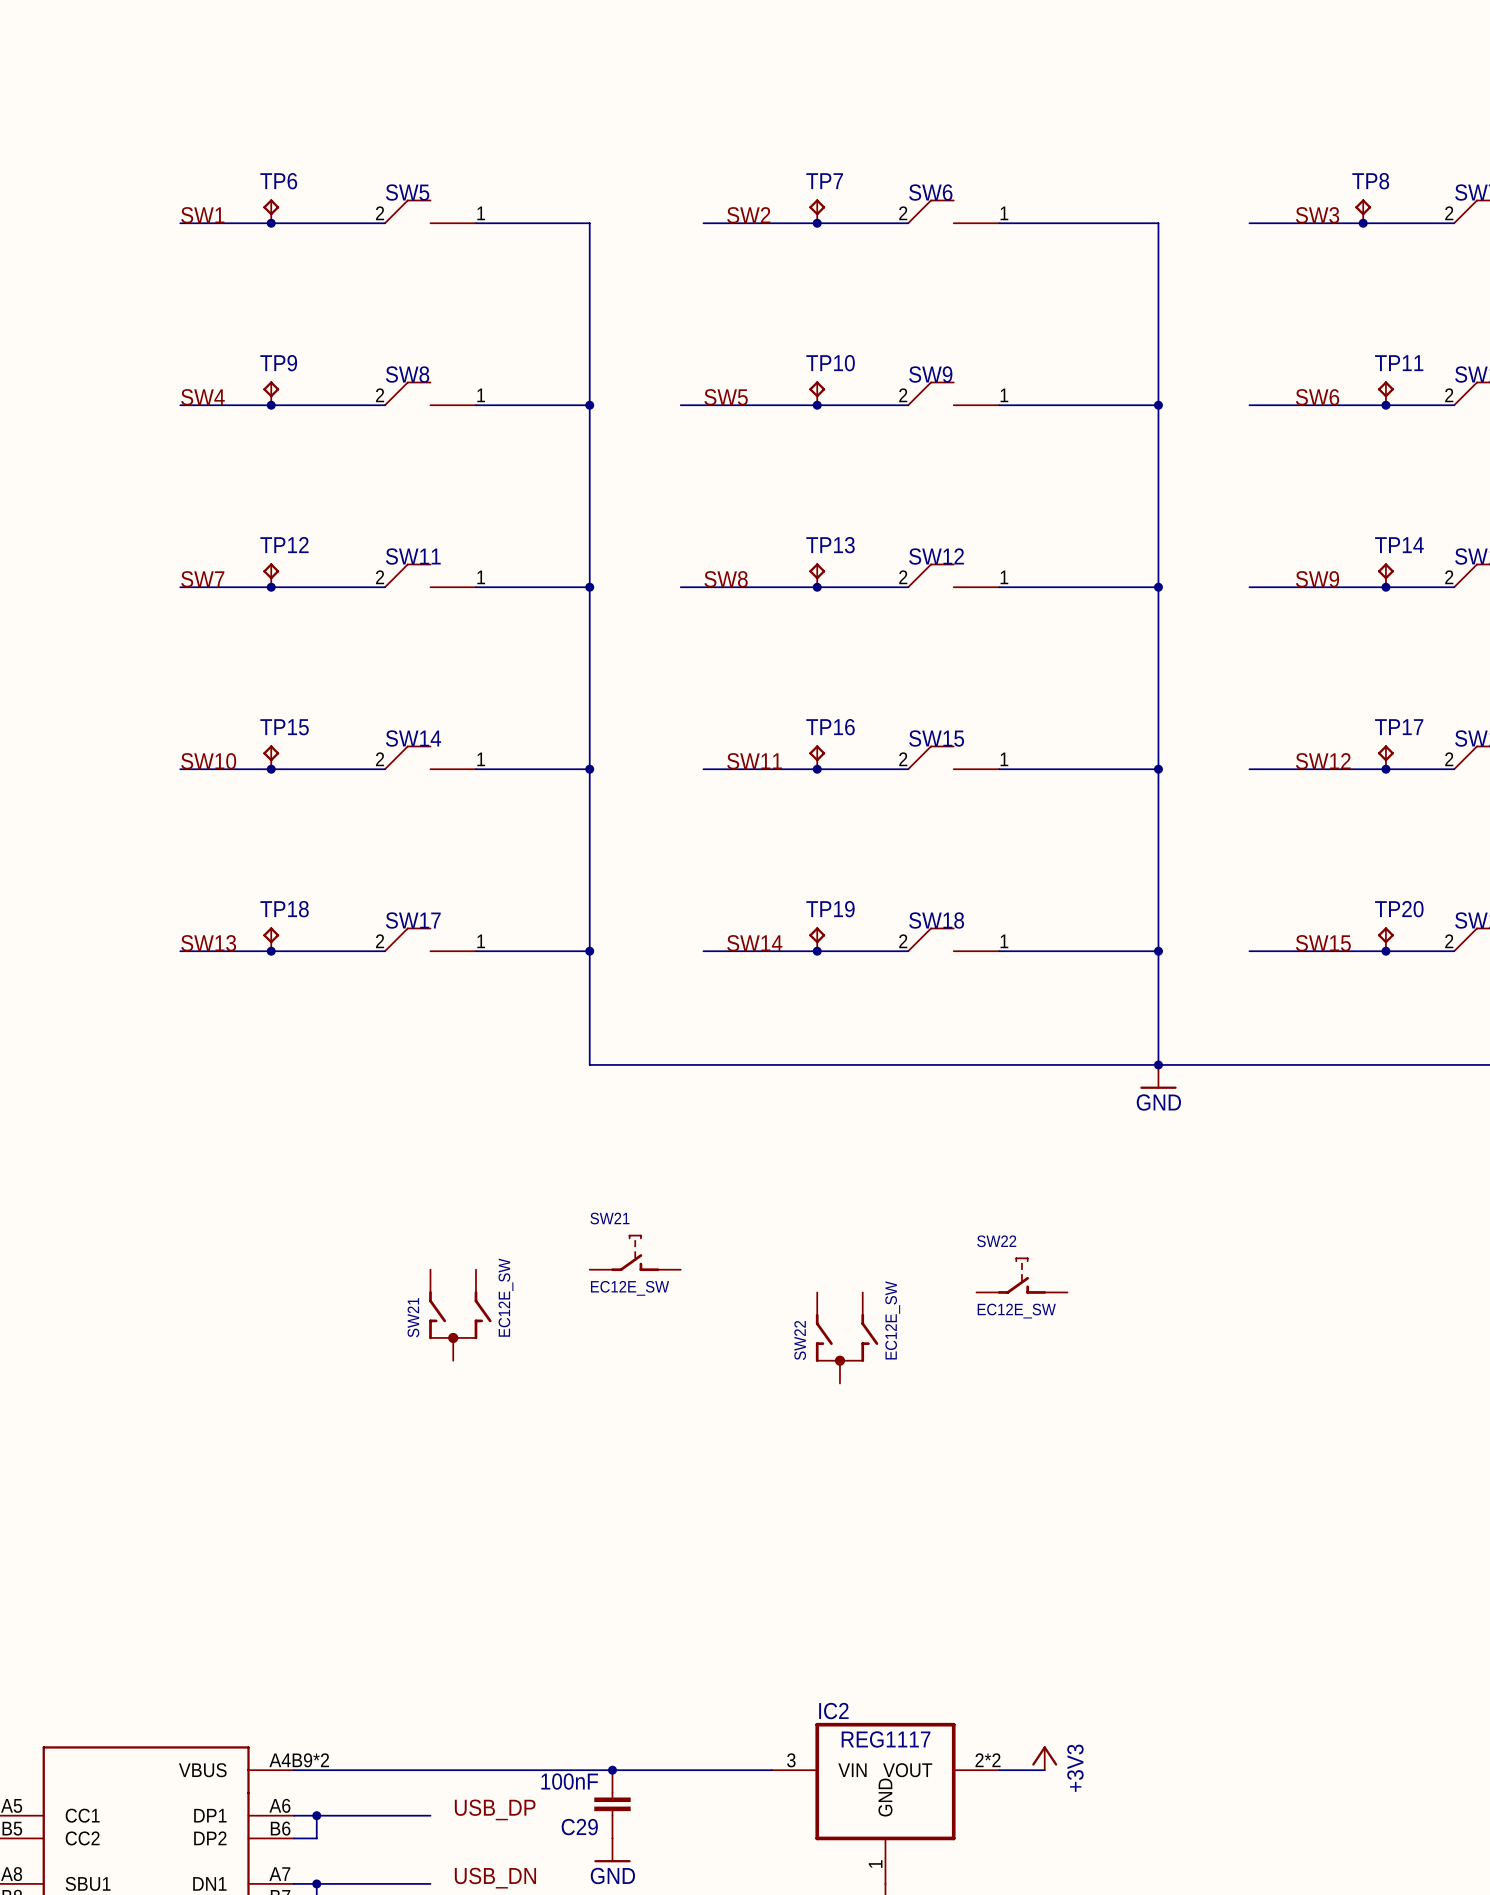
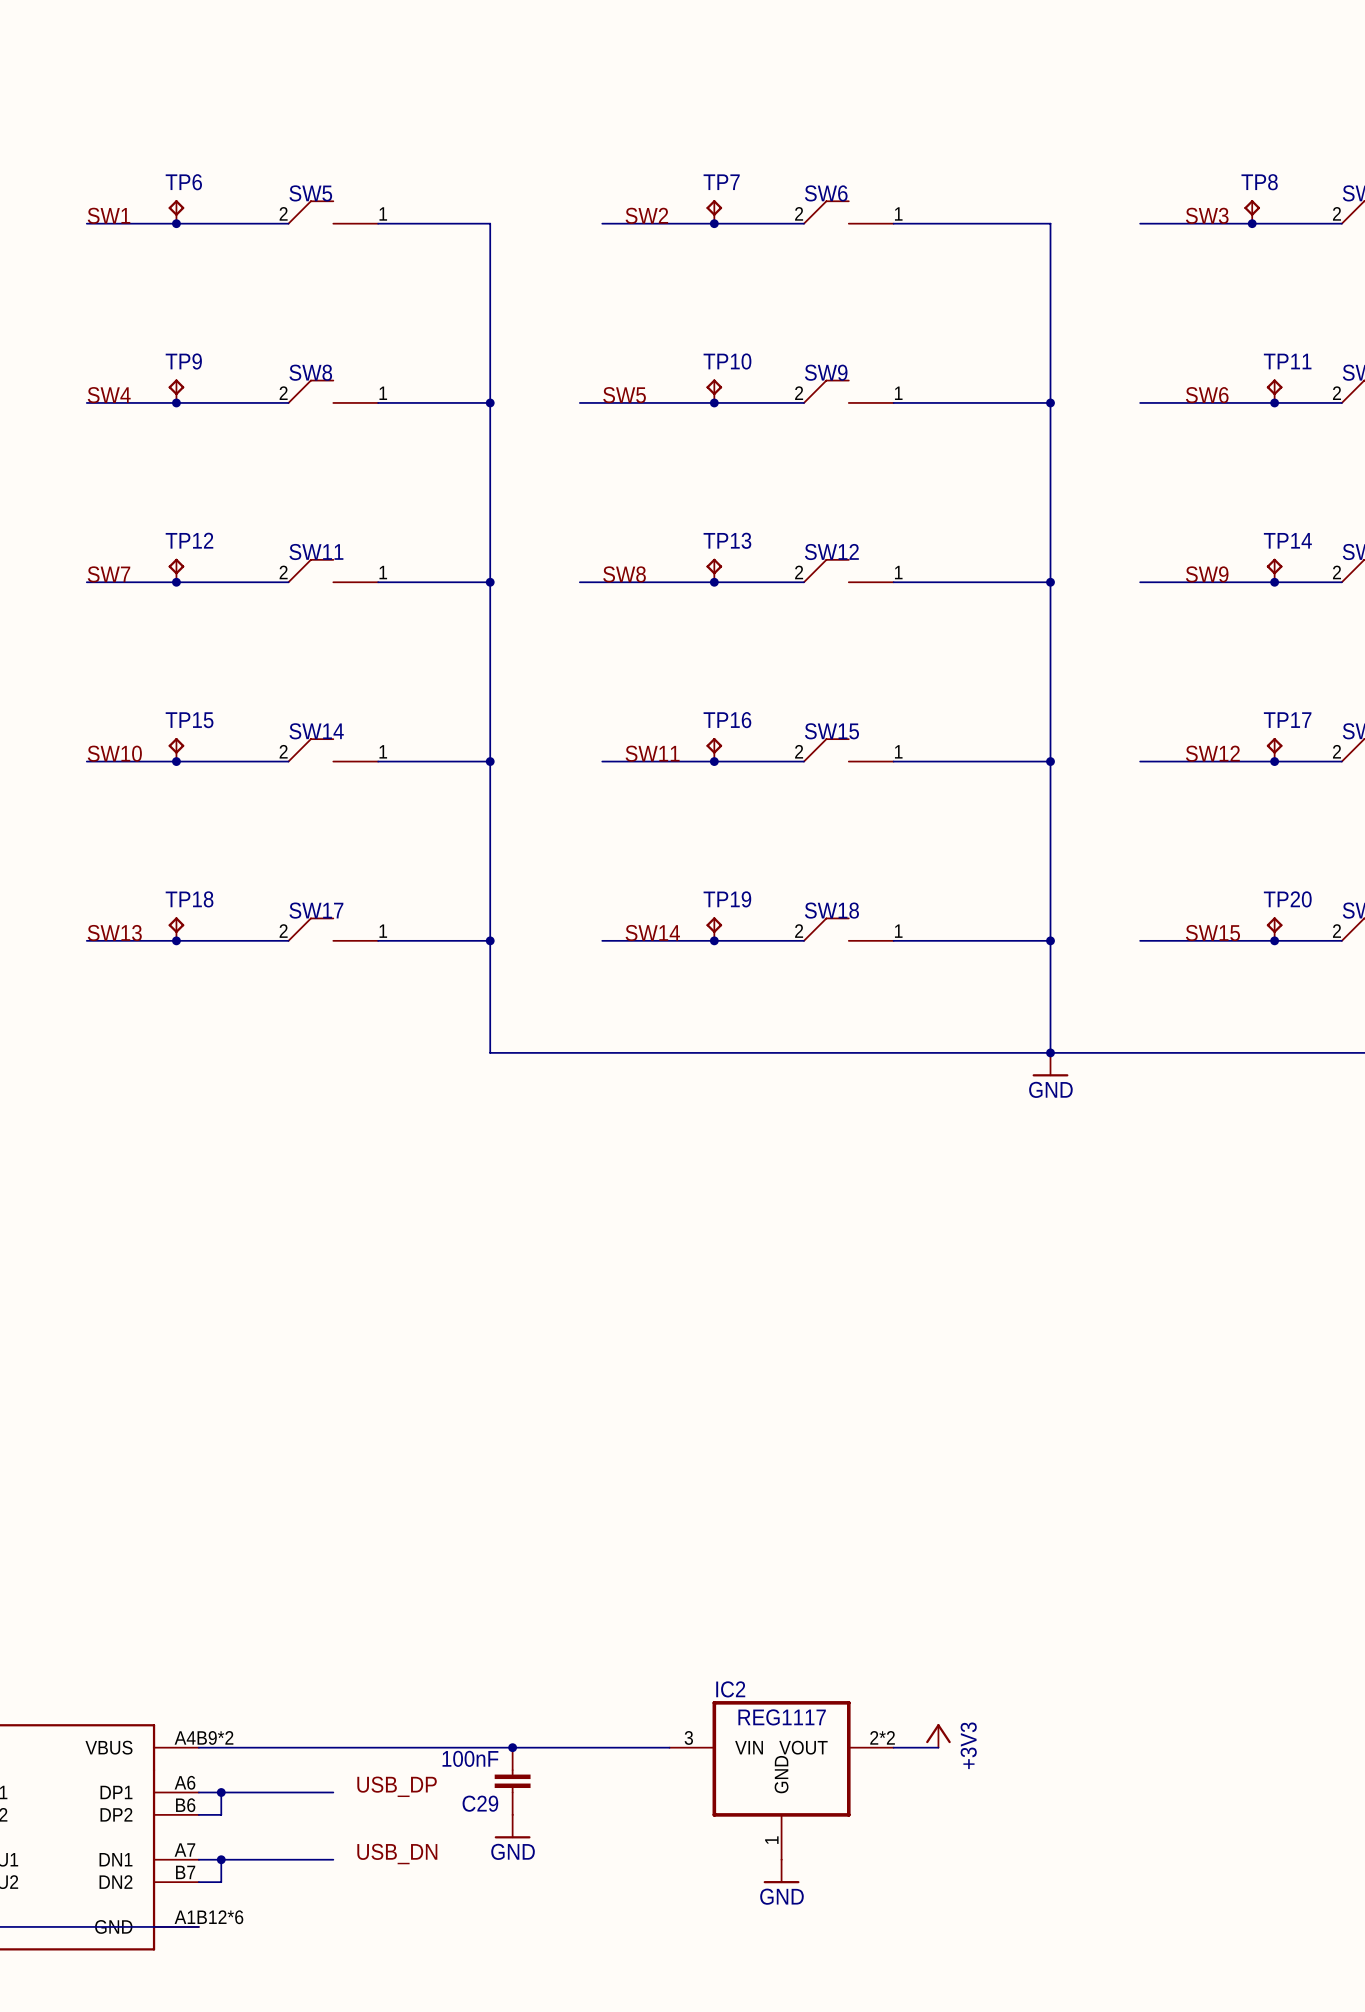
SW21: EC12E_SW (635, 1253) -> none
SW22: EC12E_SW (1021, 1275) -> none
SW21: EC12E_SW (460, 1315) -> none
SW22: EC12E_SW (847, 1337) -> none

